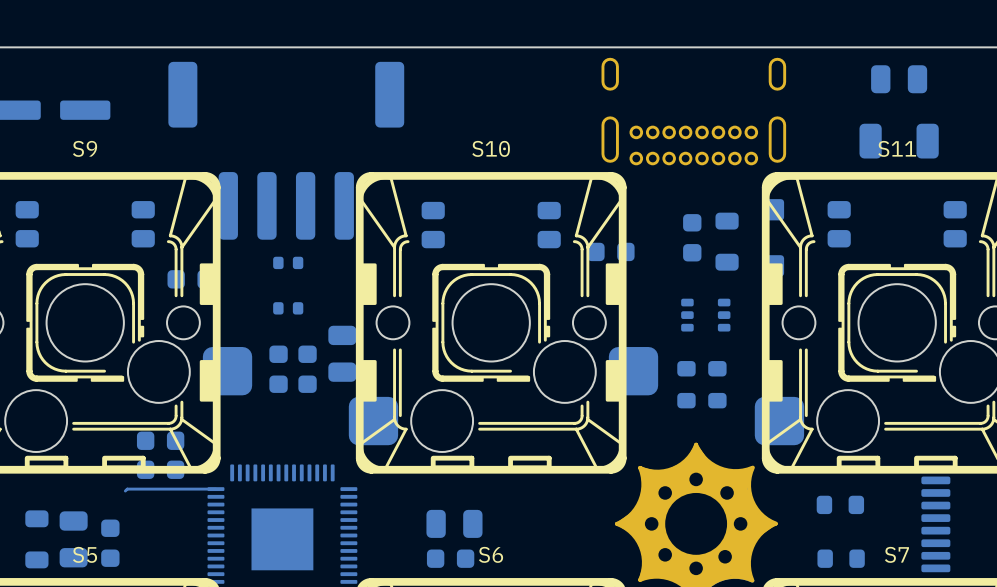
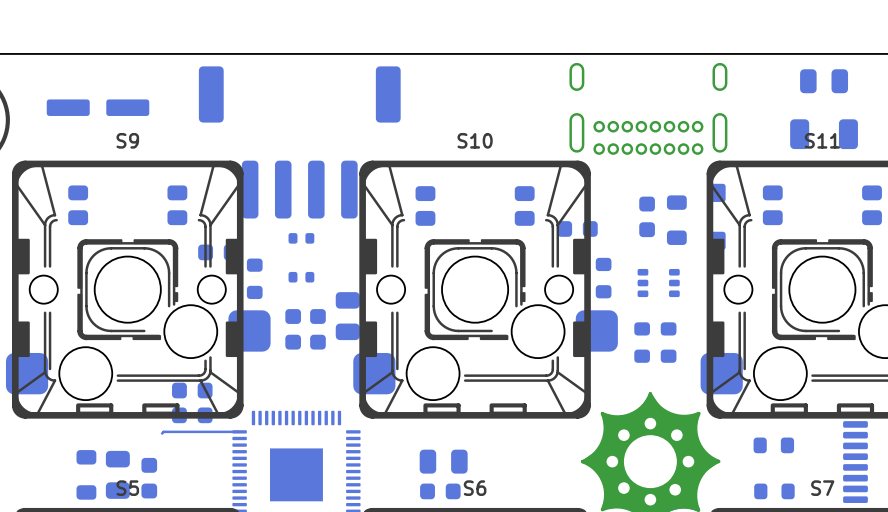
part: none -> (603, 278)
part: none -> (254, 278)

